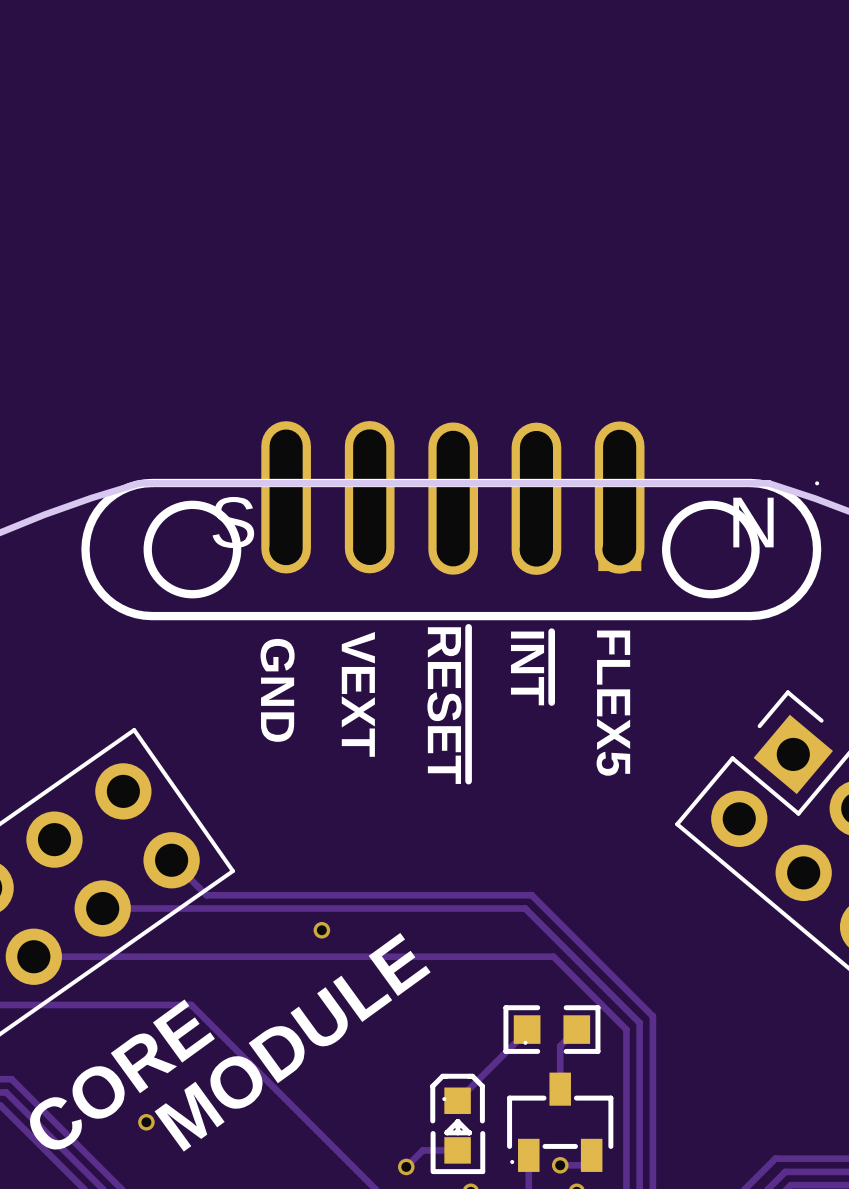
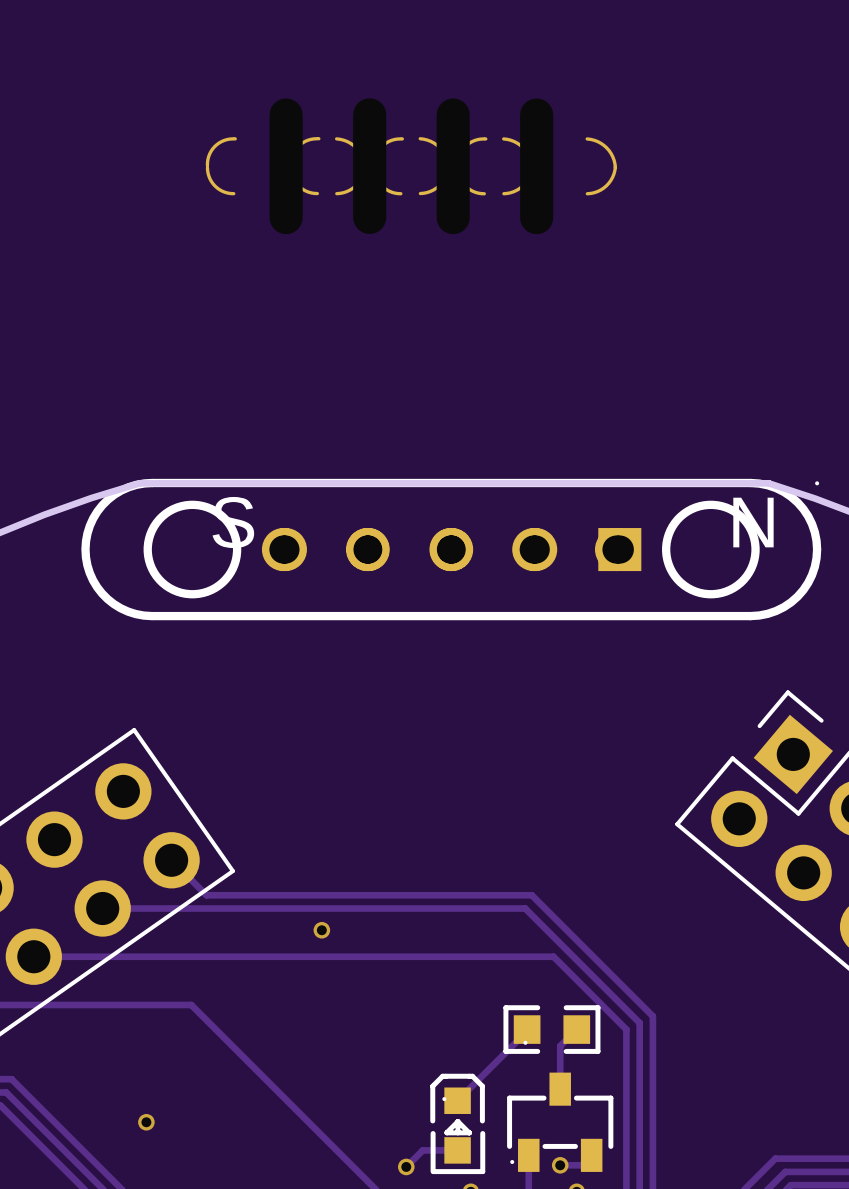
part: none -> (286, 166)
part: none -> (369, 166)
part: none -> (453, 166)
part: none -> (536, 166)
part: (286, 497) -> none
part: (369, 497) -> none
part: (619, 497) -> none
part: (453, 498) -> none
part: (536, 498) -> none
text: ~{INT} (531, 668) -> none
text: GND (277, 690) -> none
text: VEXT (358, 694) -> none
text: FLEX5 (613, 703) -> none
text: ~{RESET} (448, 705) -> none
text: MODULE (292, 1042) -> none
text: CORE (121, 1075) -> none

